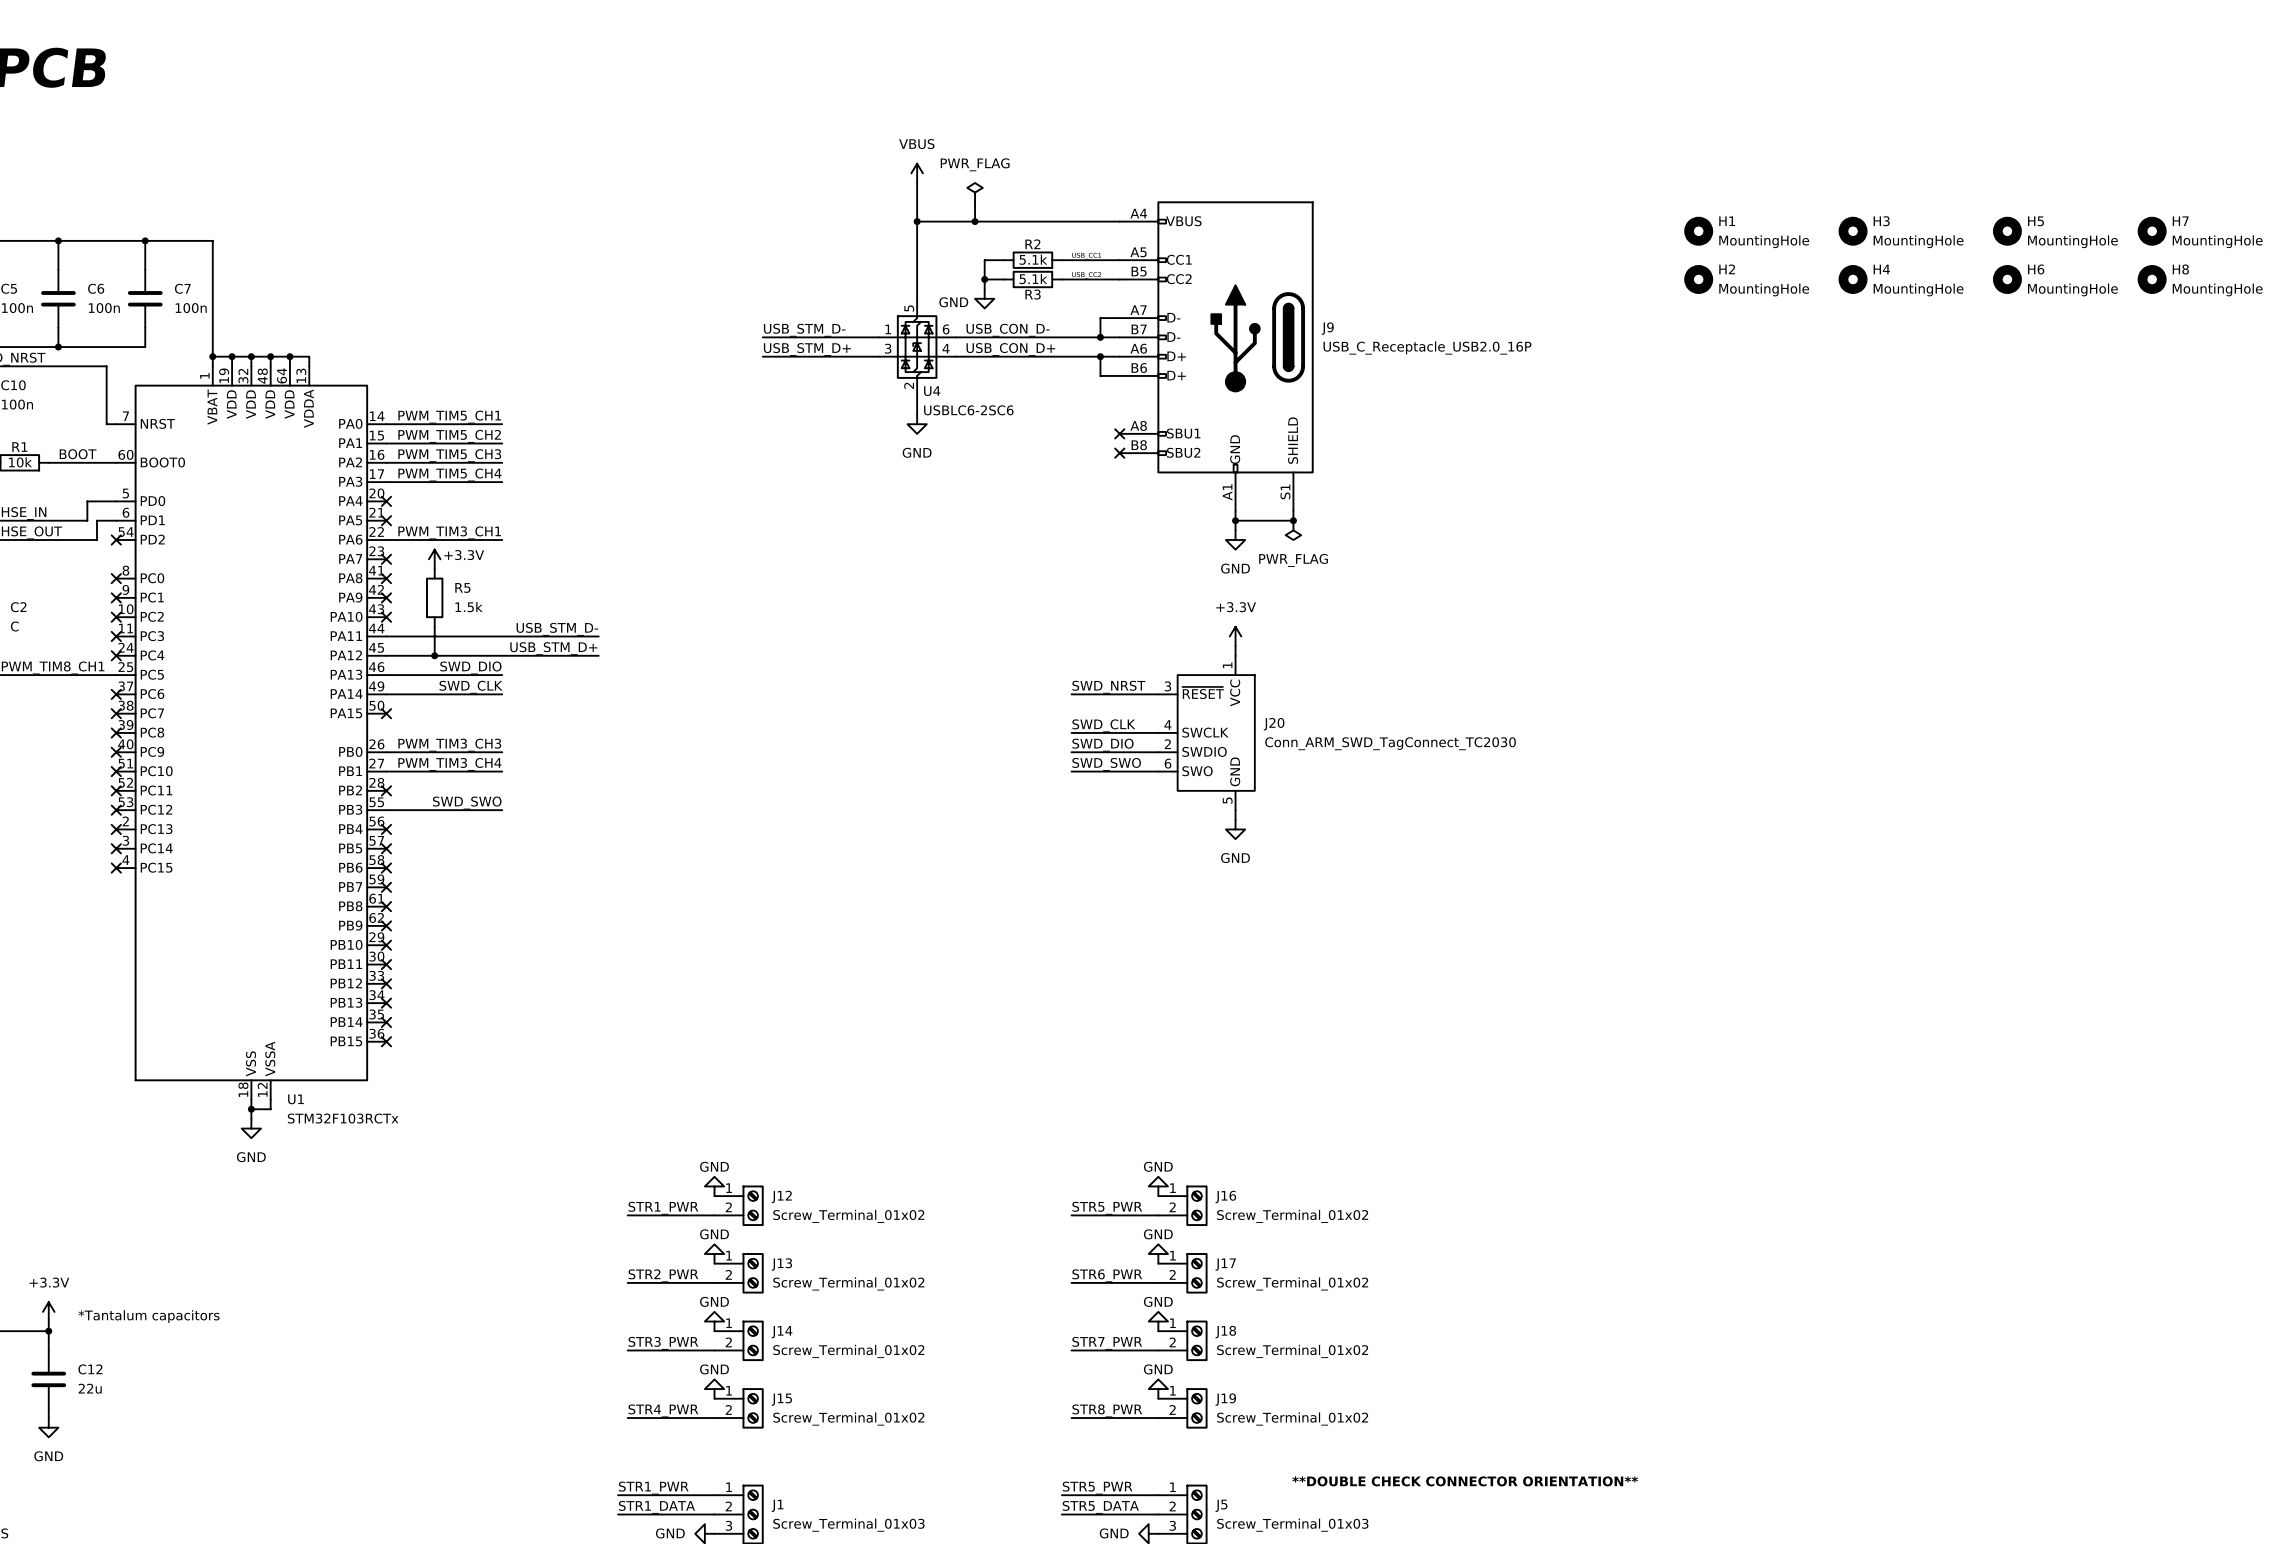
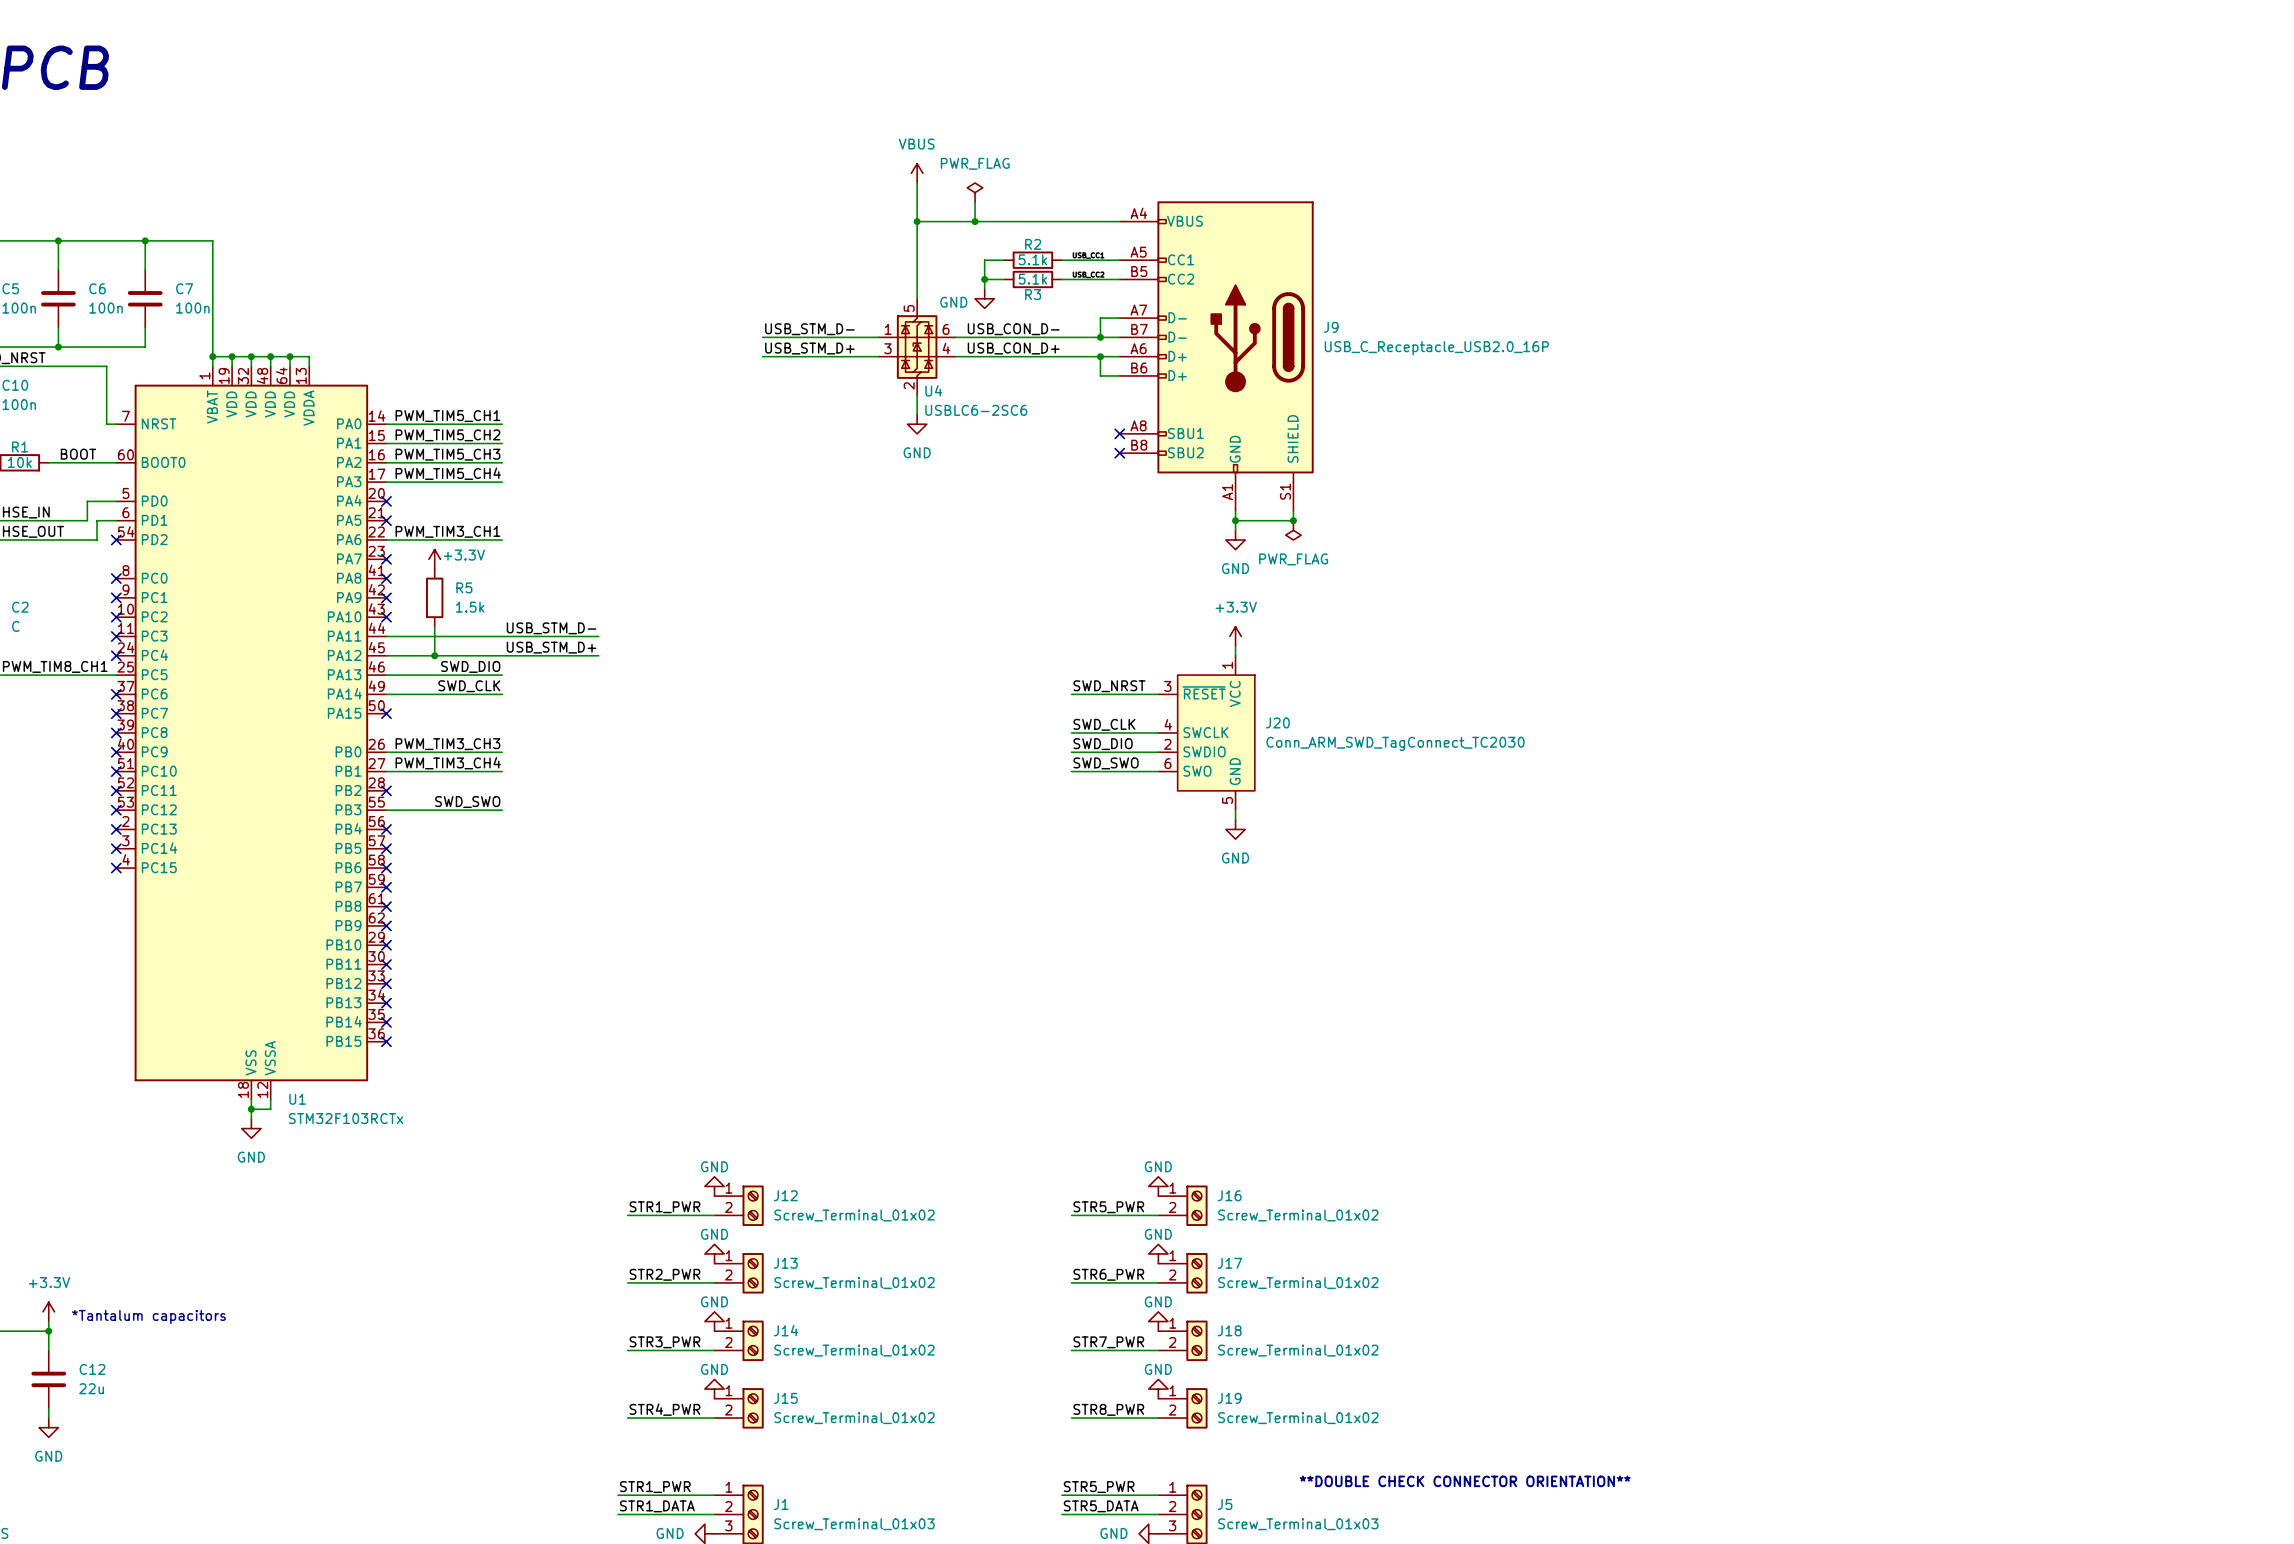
H1: MountingHole (1698, 231) -> none
H3: MountingHole (1853, 231) -> none
H5: MountingHole (2007, 231) -> none
H7: MountingHole (2152, 231) -> none
H2: MountingHole (1698, 279) -> none
H4: MountingHole (1853, 279) -> none
H6: MountingHole (2007, 279) -> none
H8: MountingHole (2152, 279) -> none

